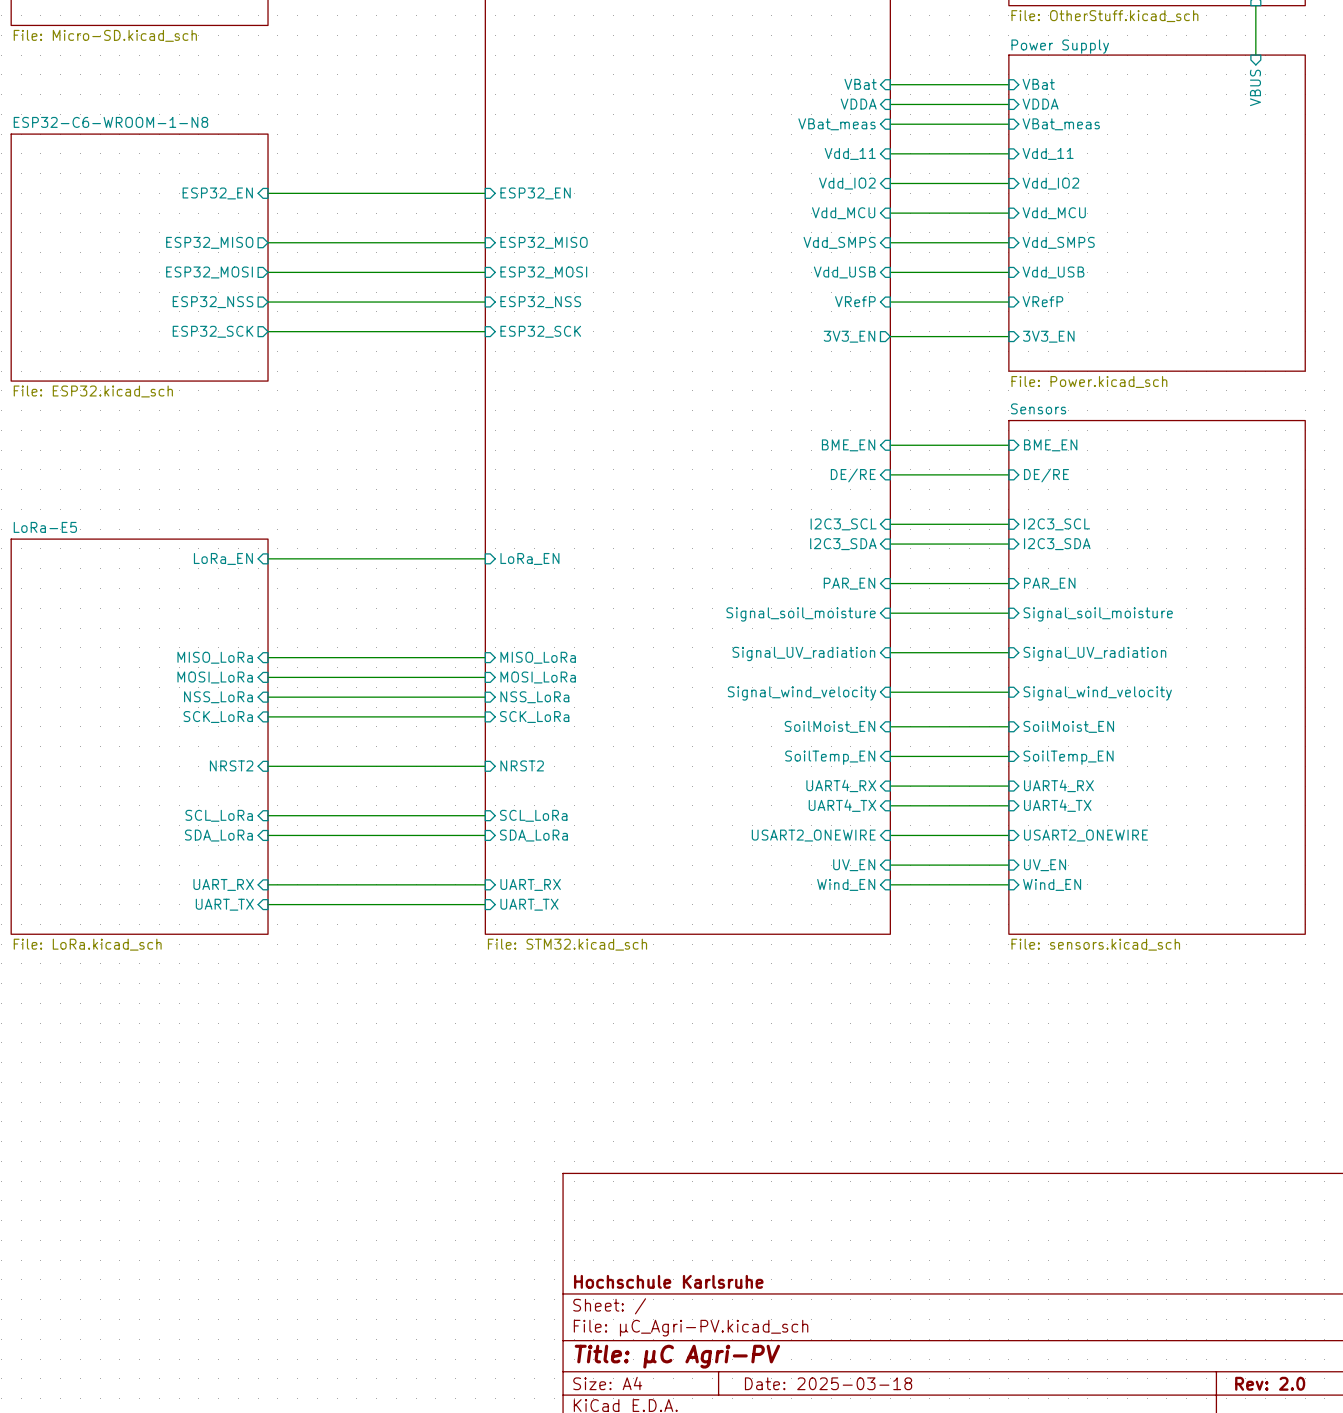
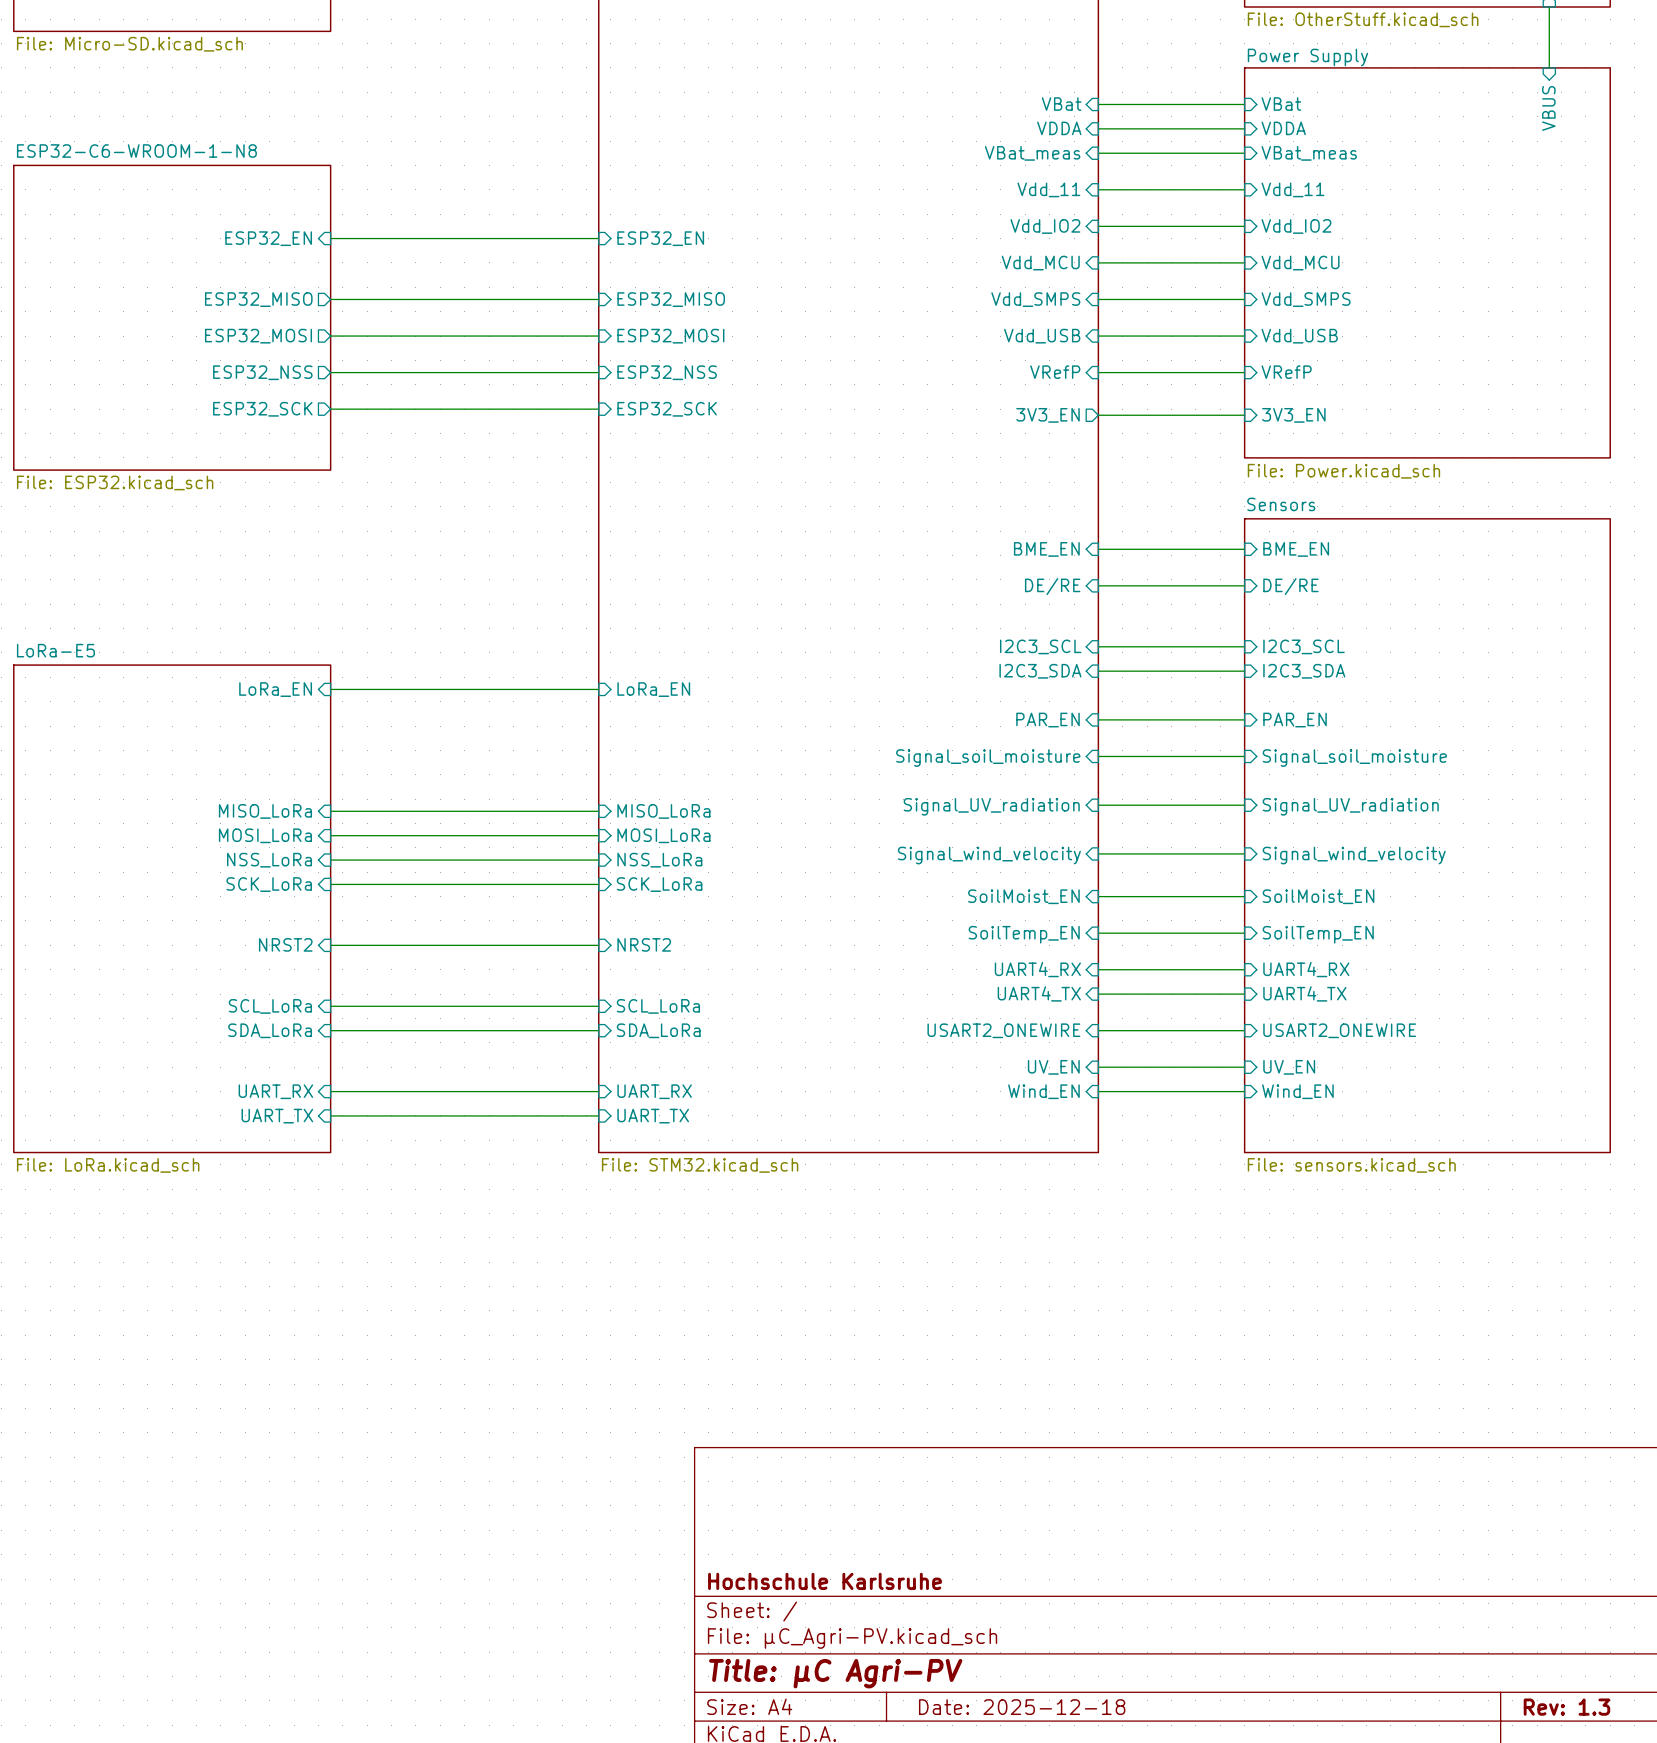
title block: Date: 2025-03-18 (828, 1383) -> Date: 2025-12-18 (1022, 1707)
title block: Rev: 2.0 (1270, 1383) -> Rev: 1.3 (1566, 1707)

